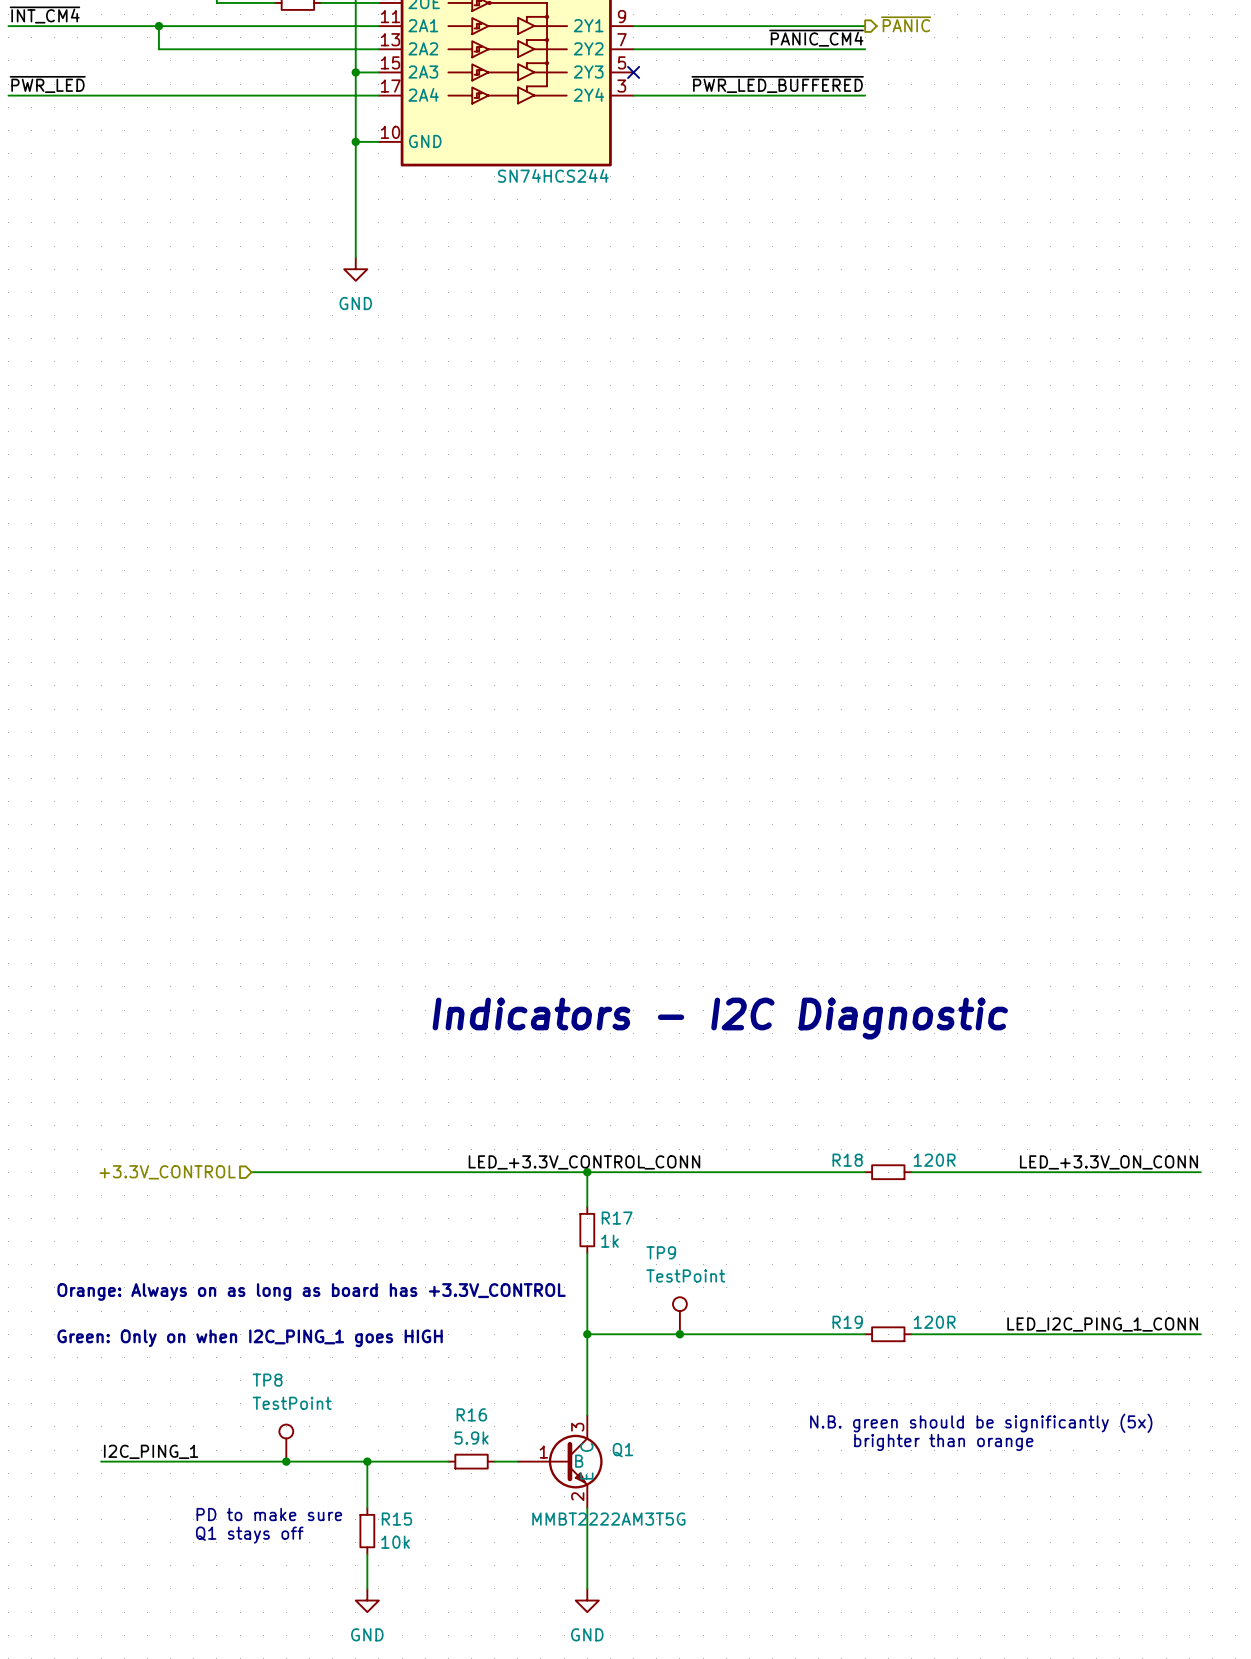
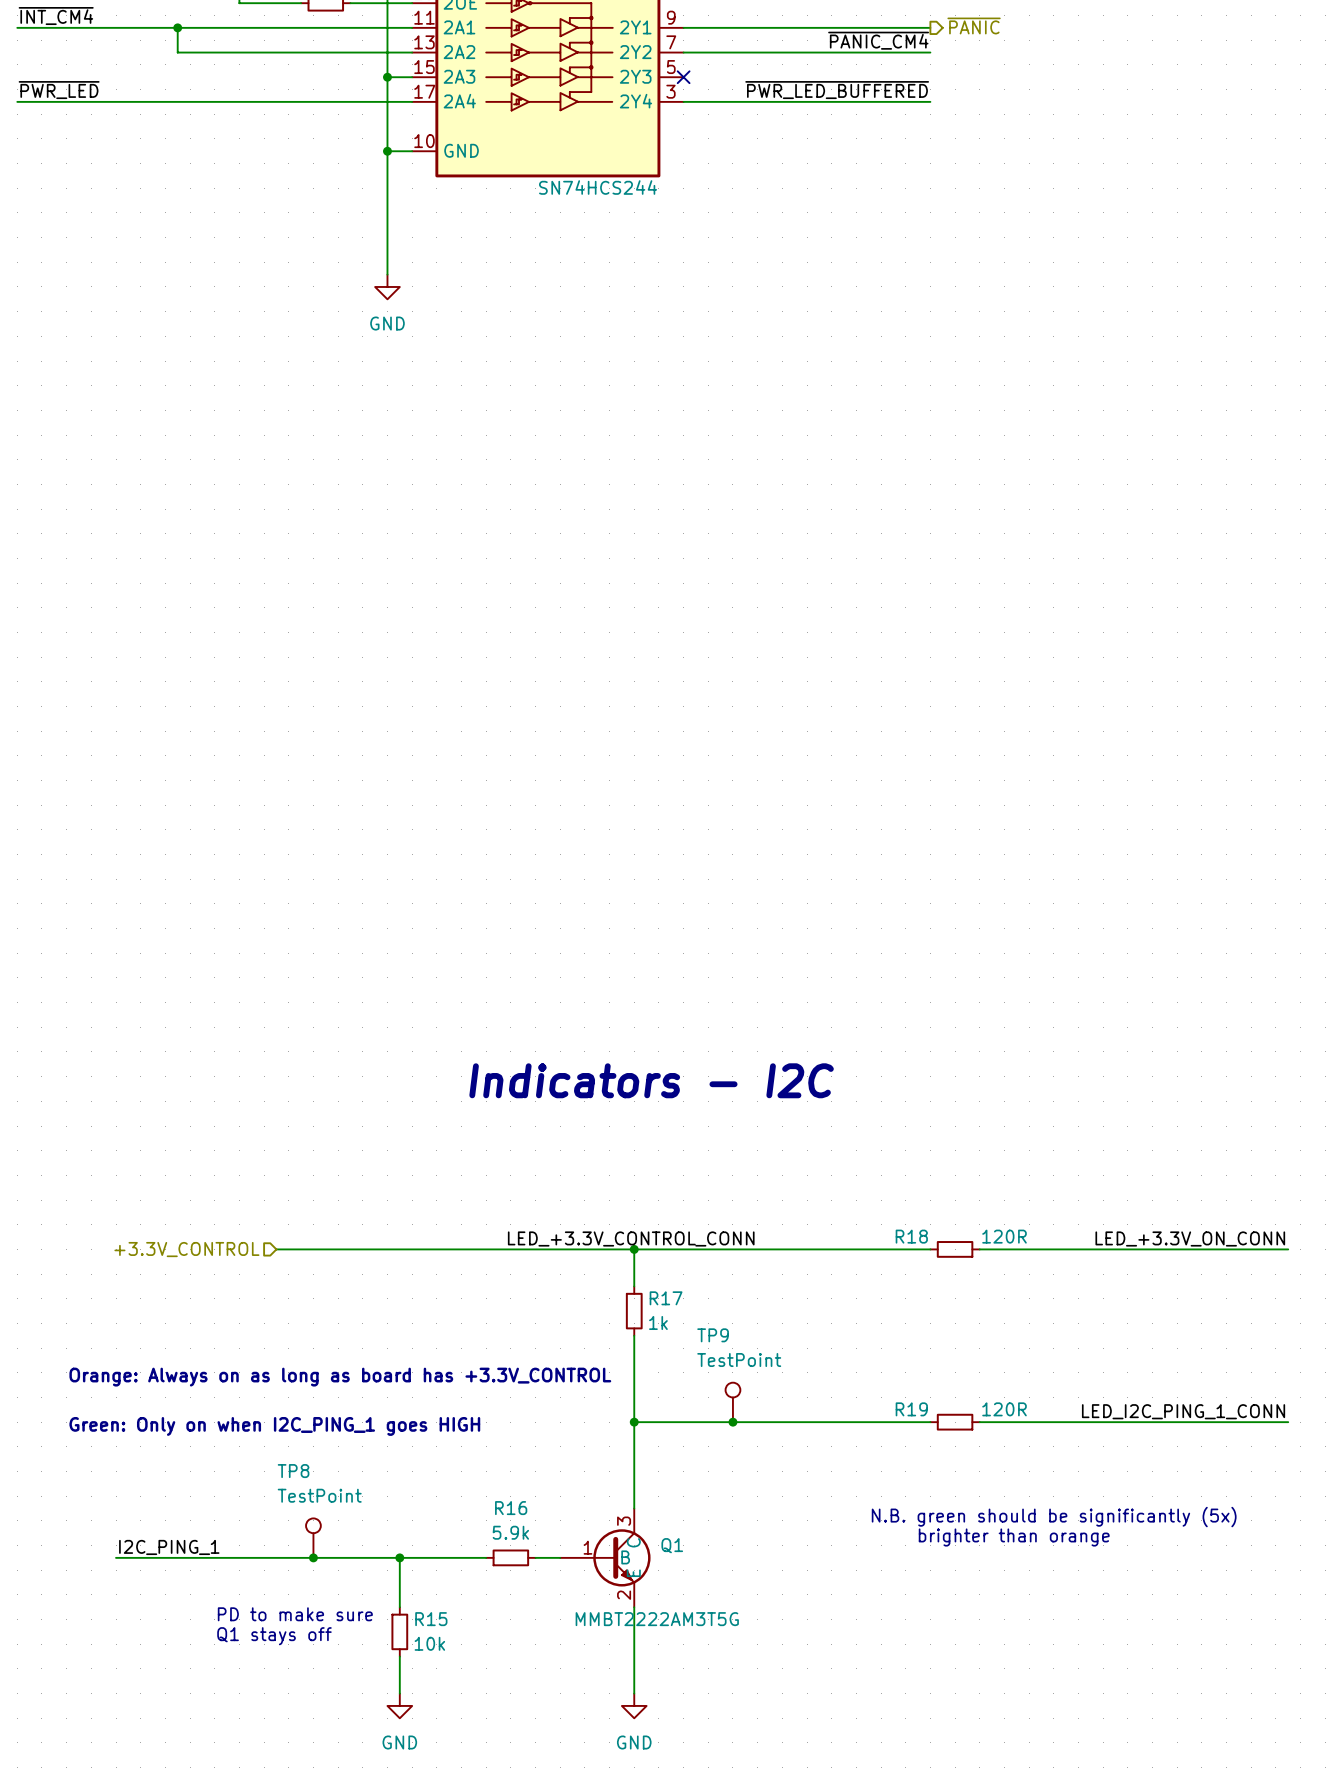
text: Indicators - I2C Diagnostic (720, 1018) -> Indicators - I2C (651, 1080)

